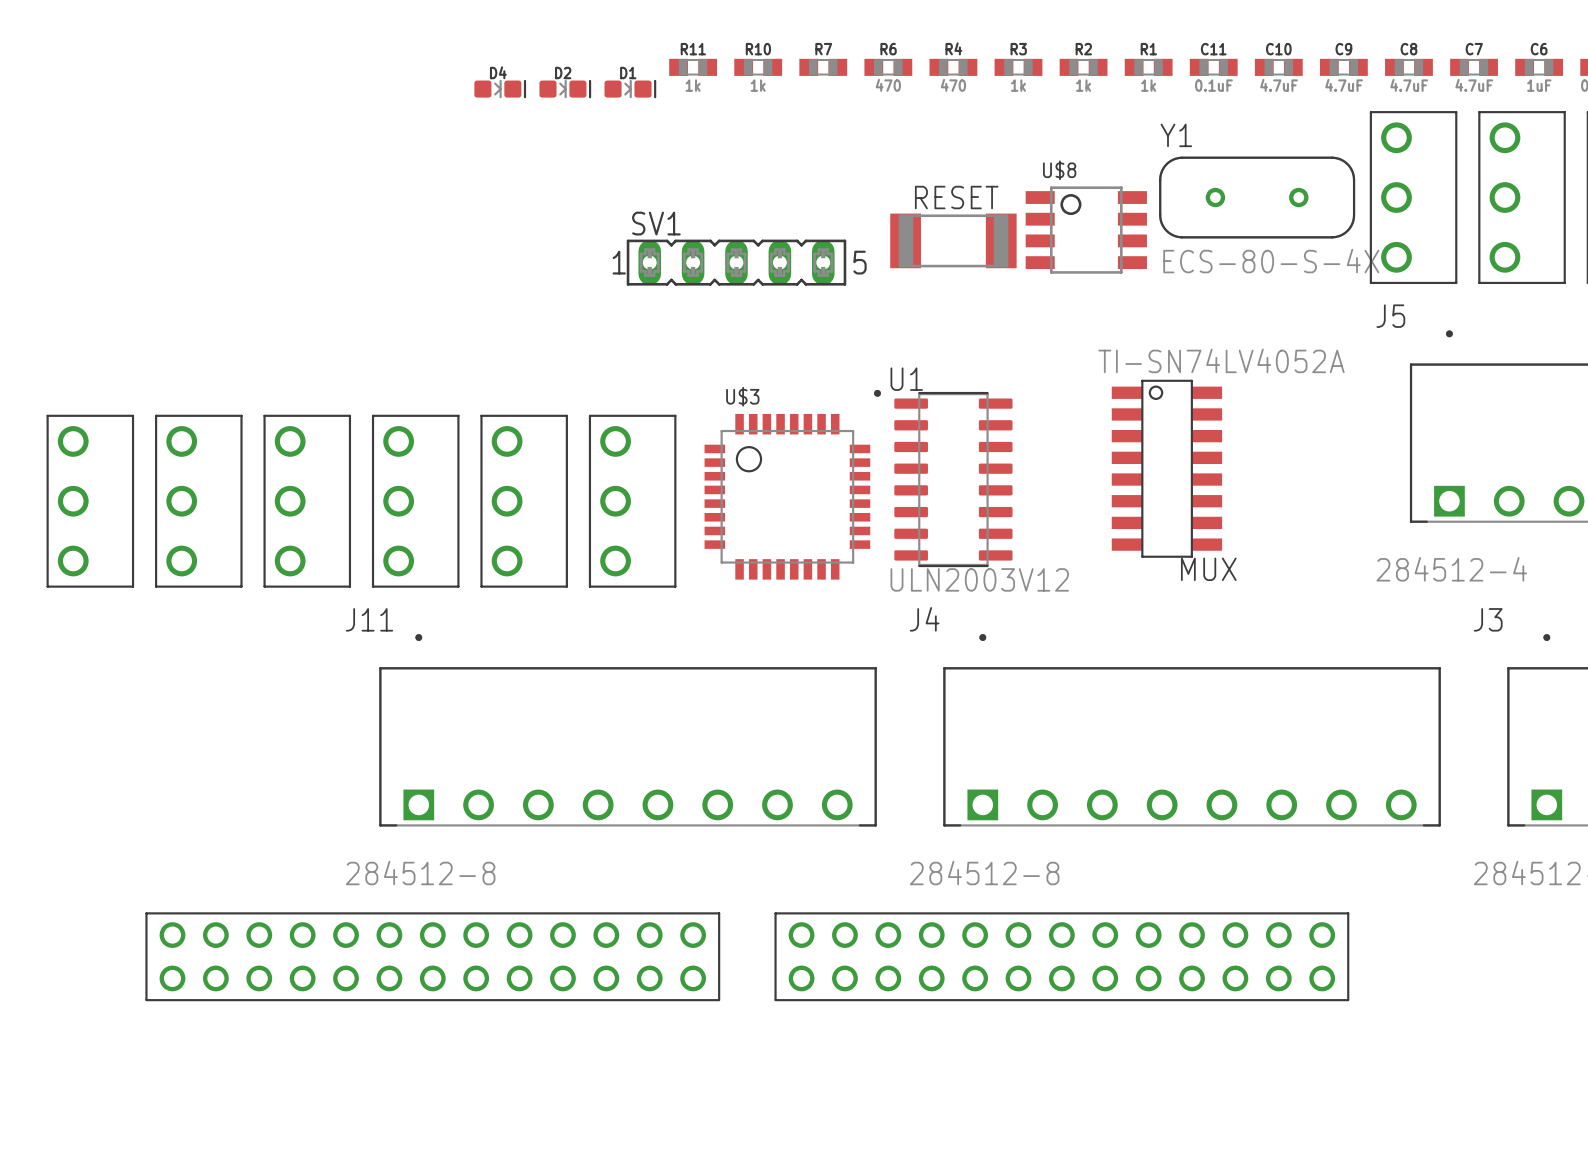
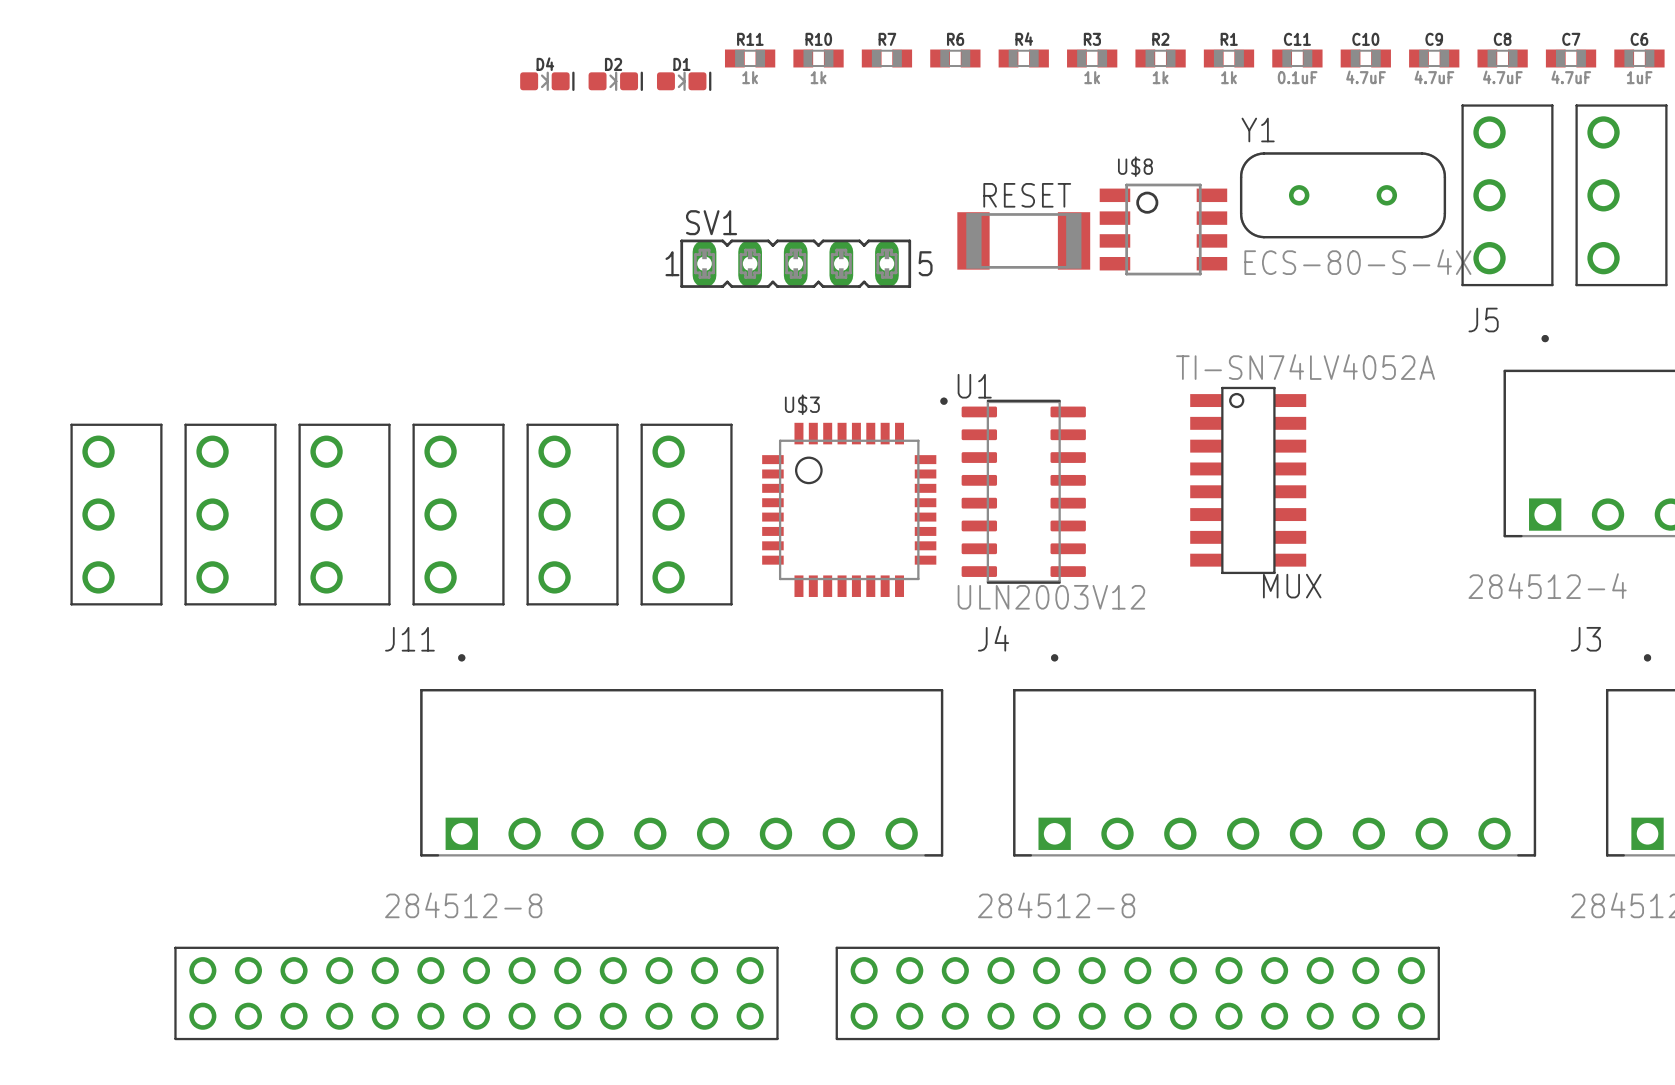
R6 value: 470 (888, 85) -> none
R4 value: 470 (953, 85) -> none

